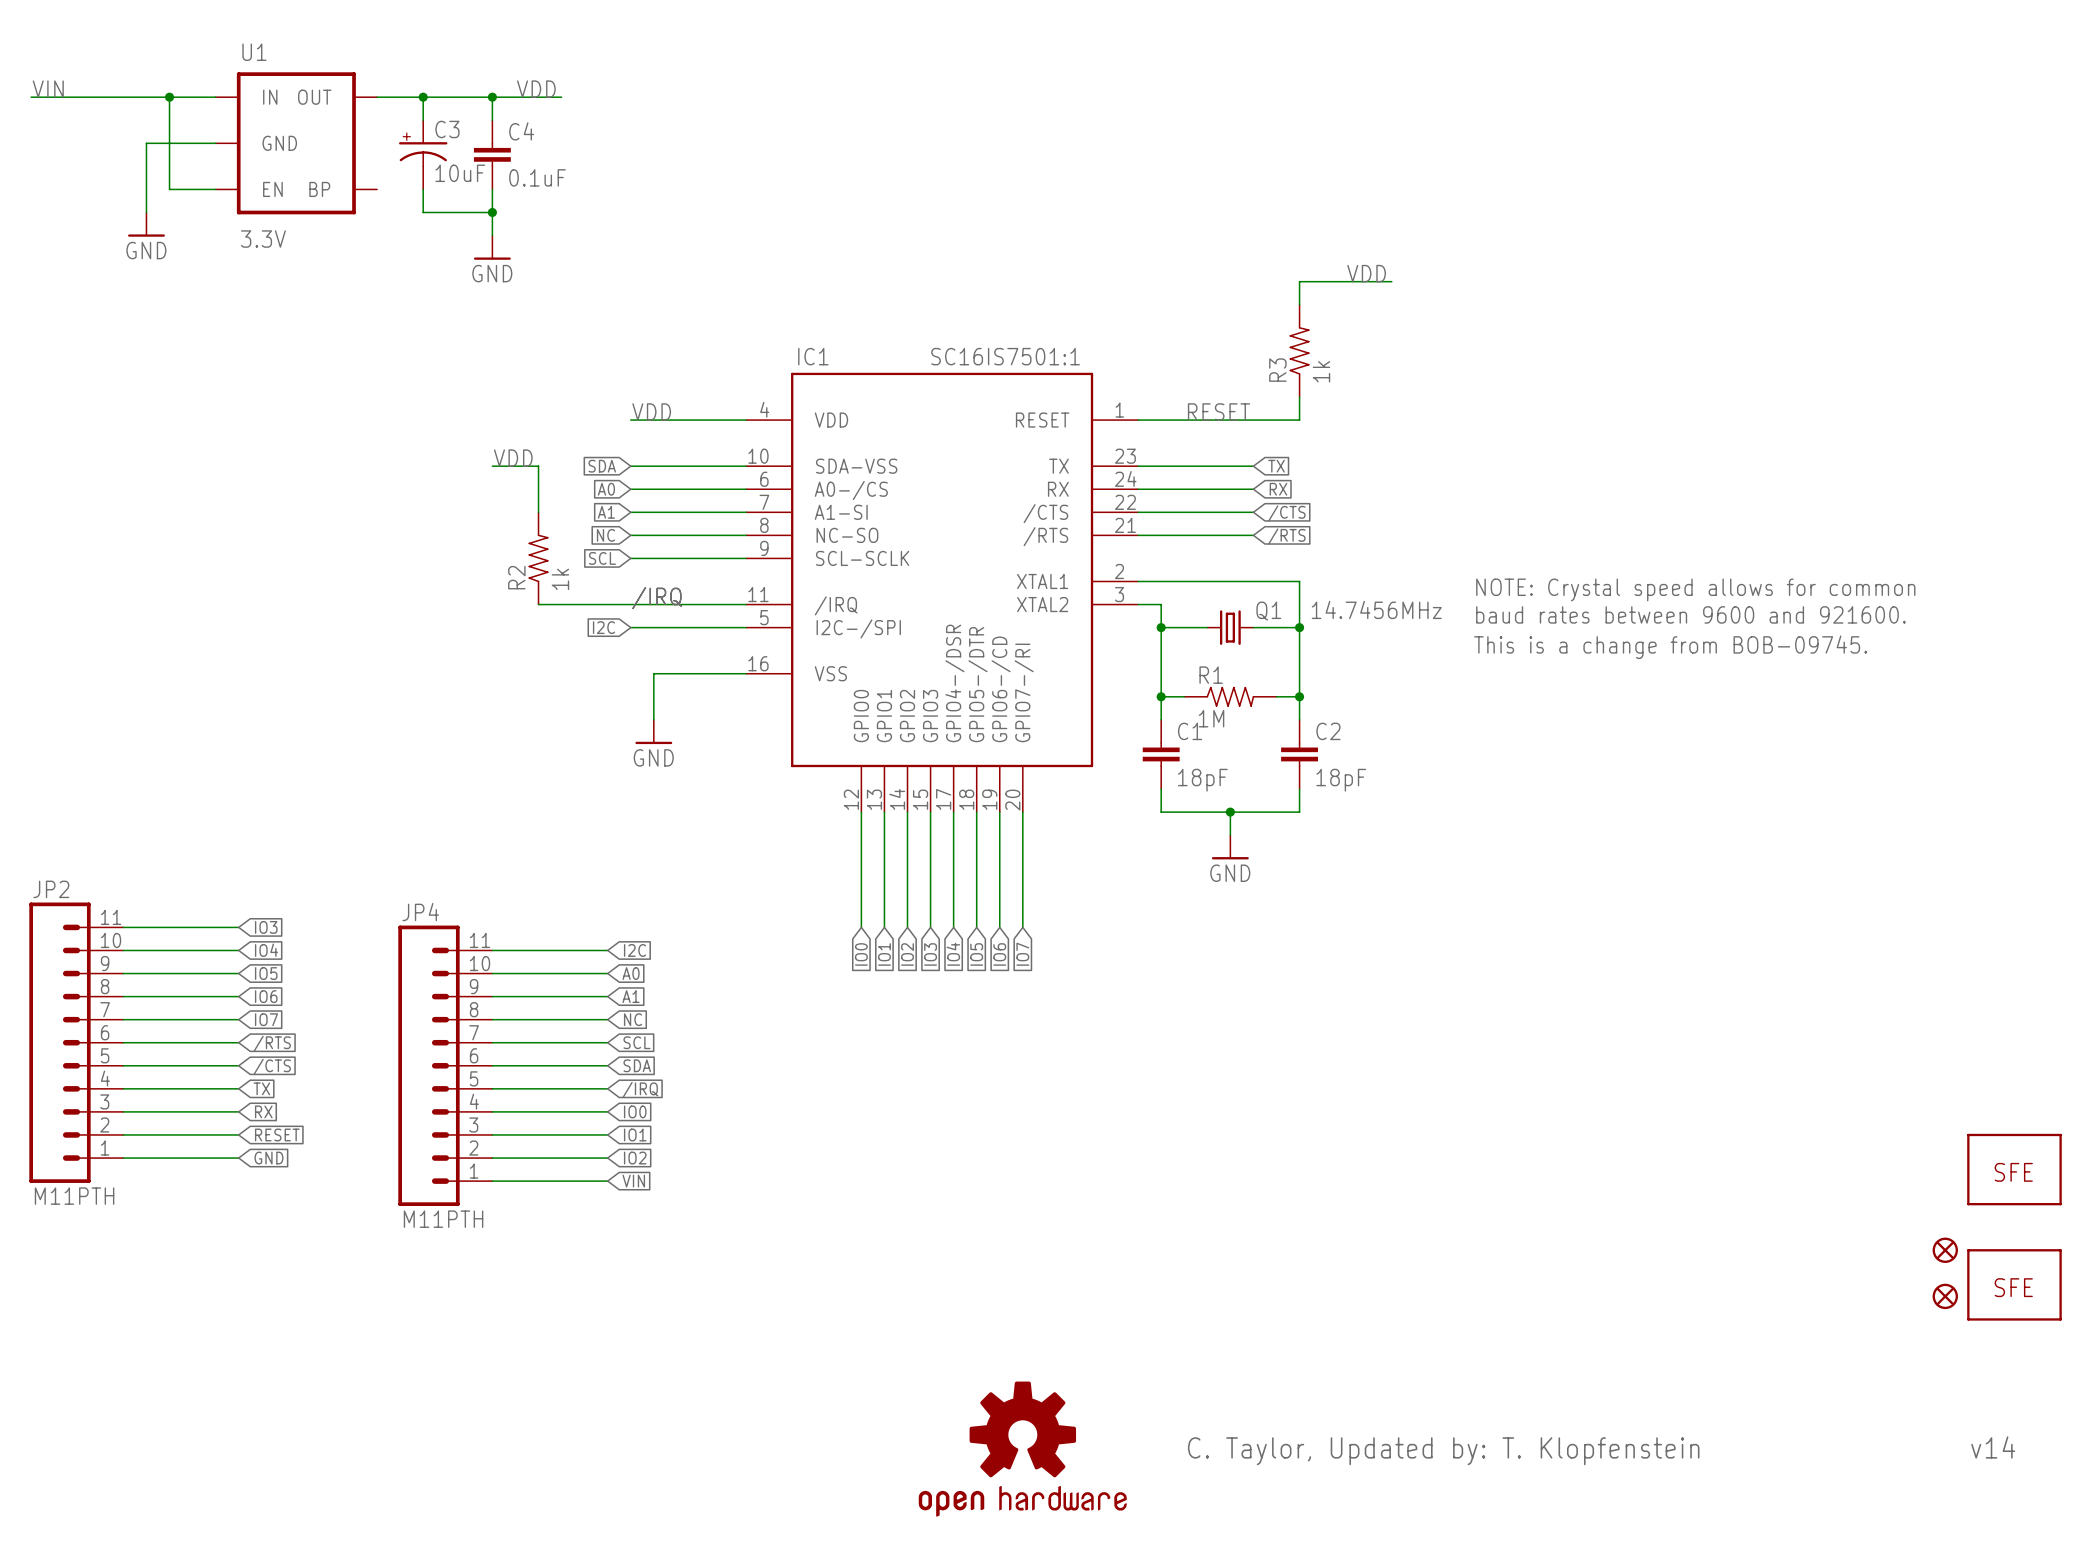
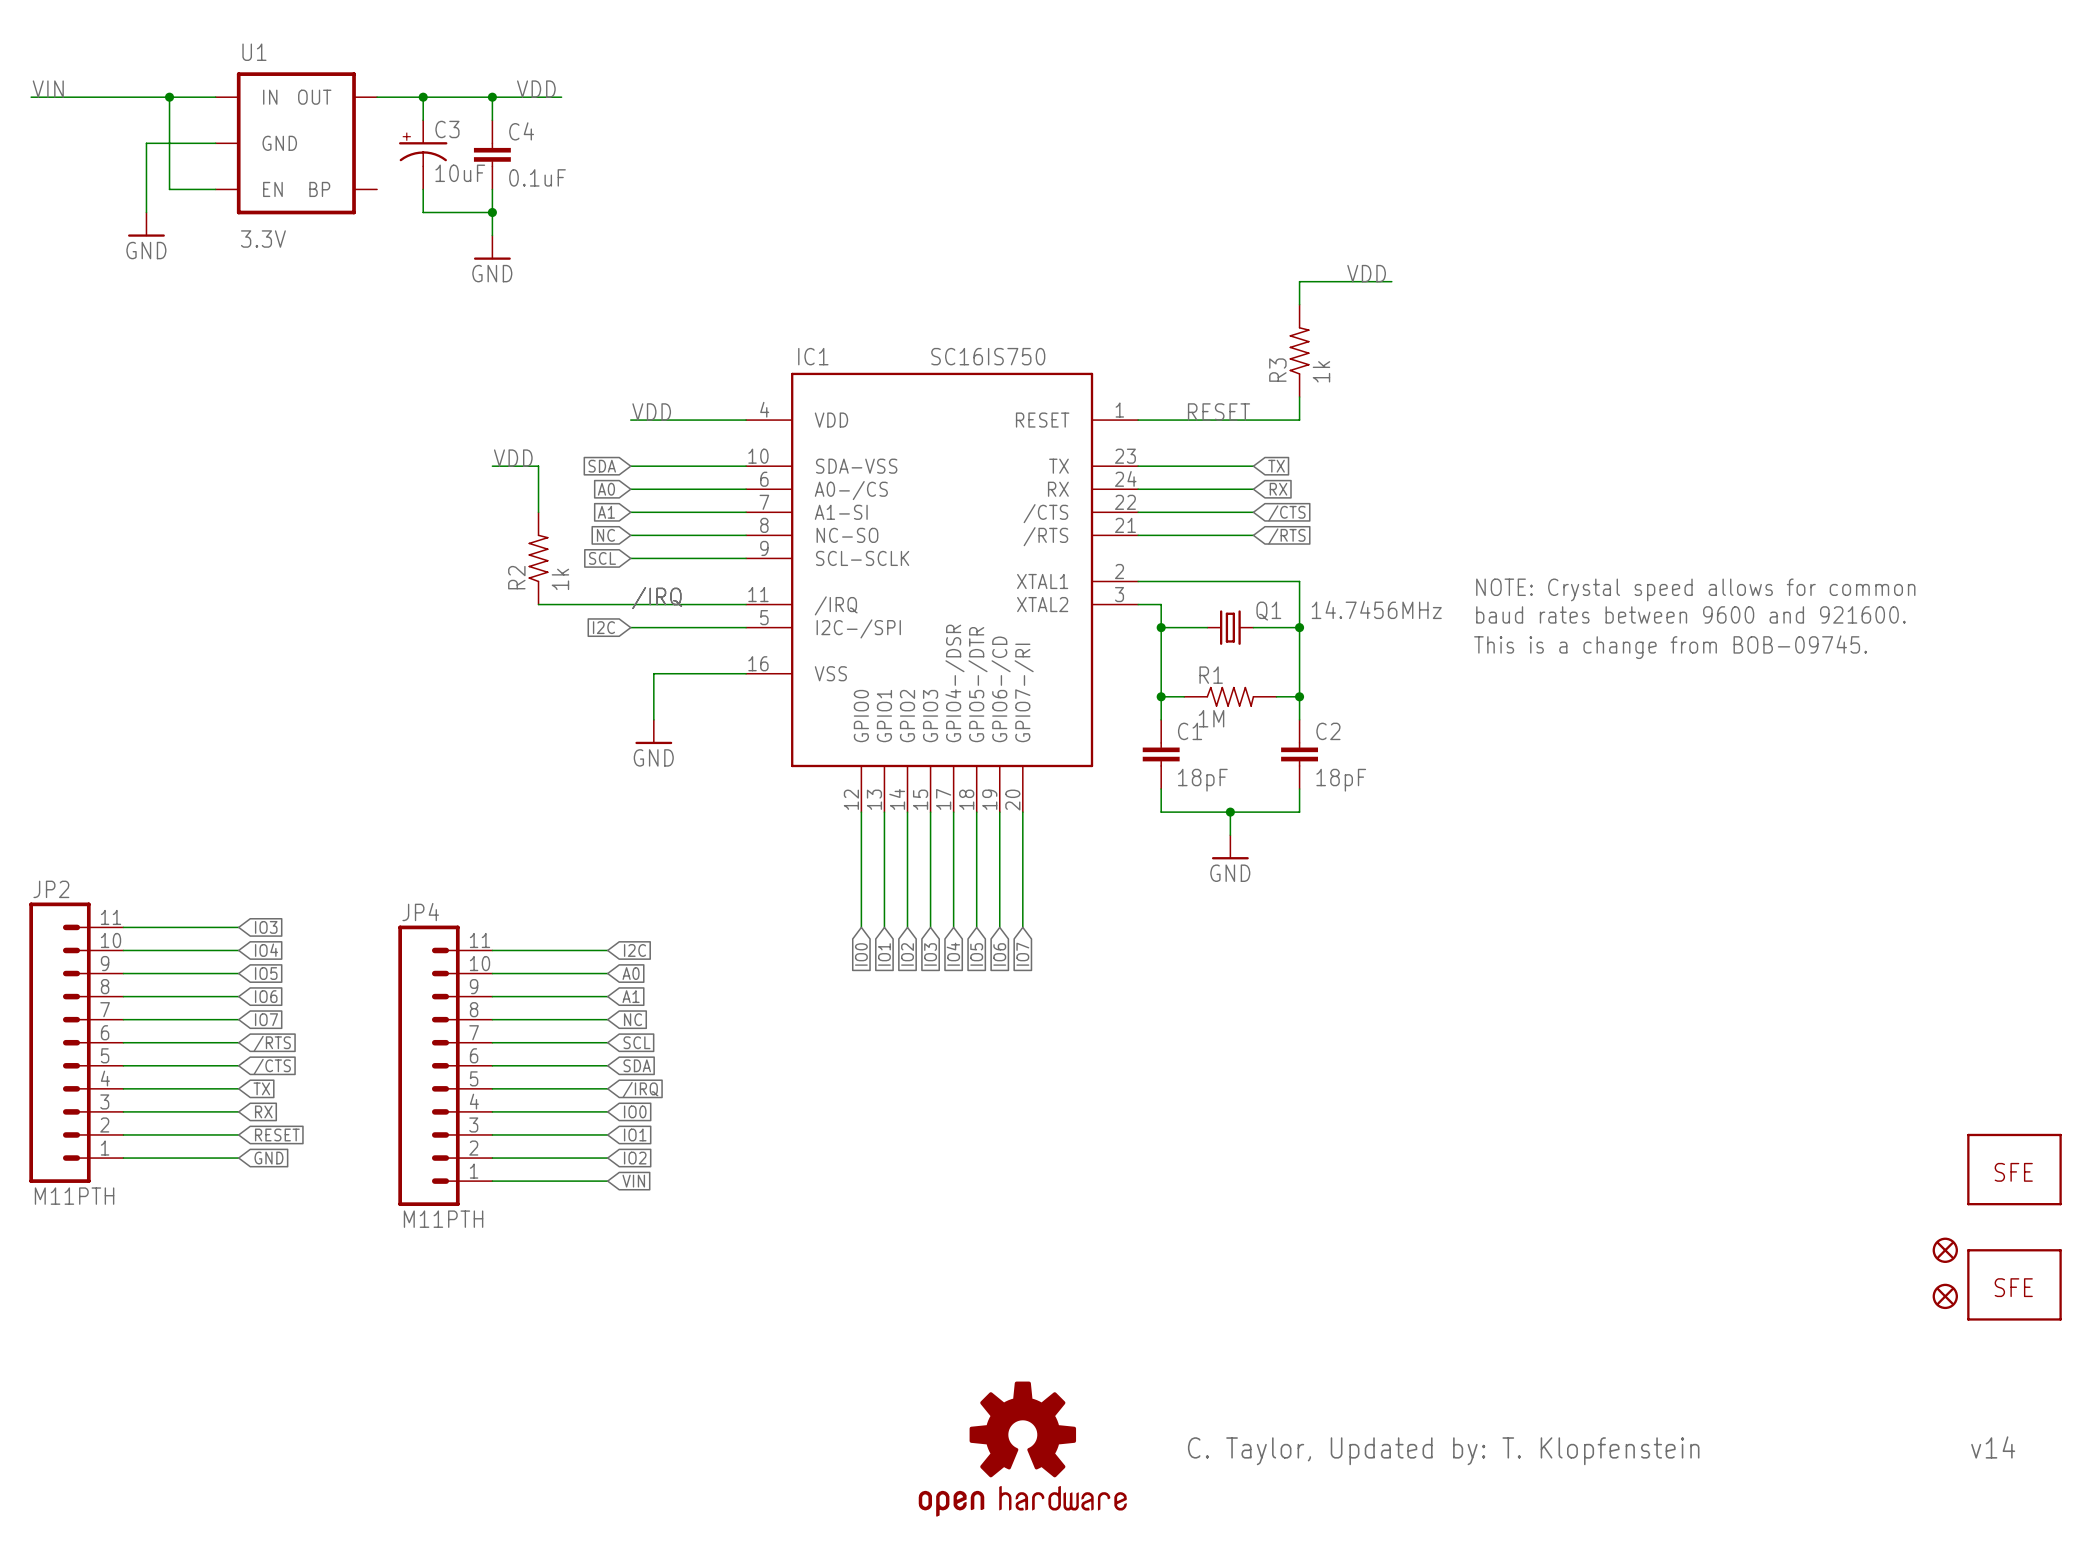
IC1 value: SC16IS7501:1 (1005, 356) -> SC16IS750 (988, 356)

